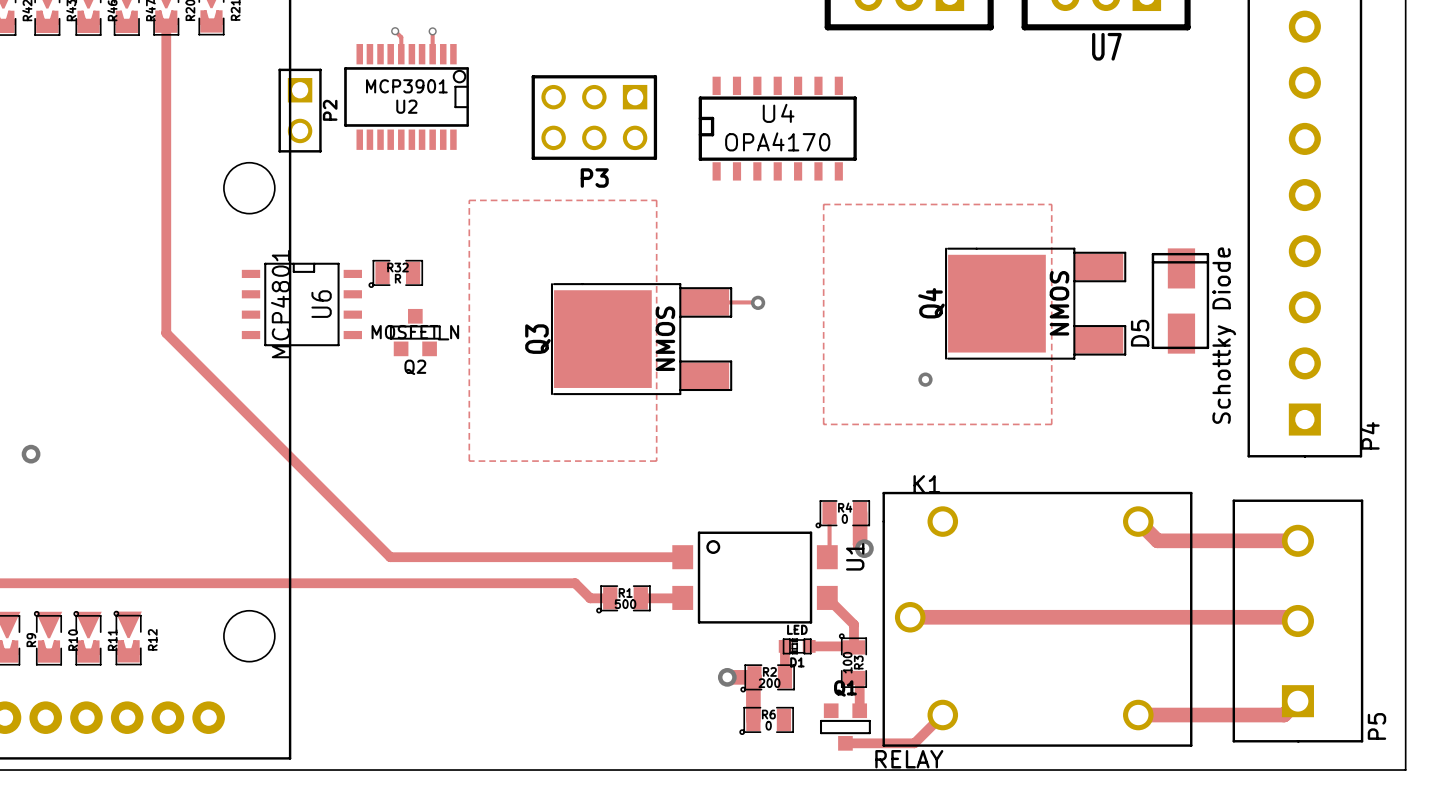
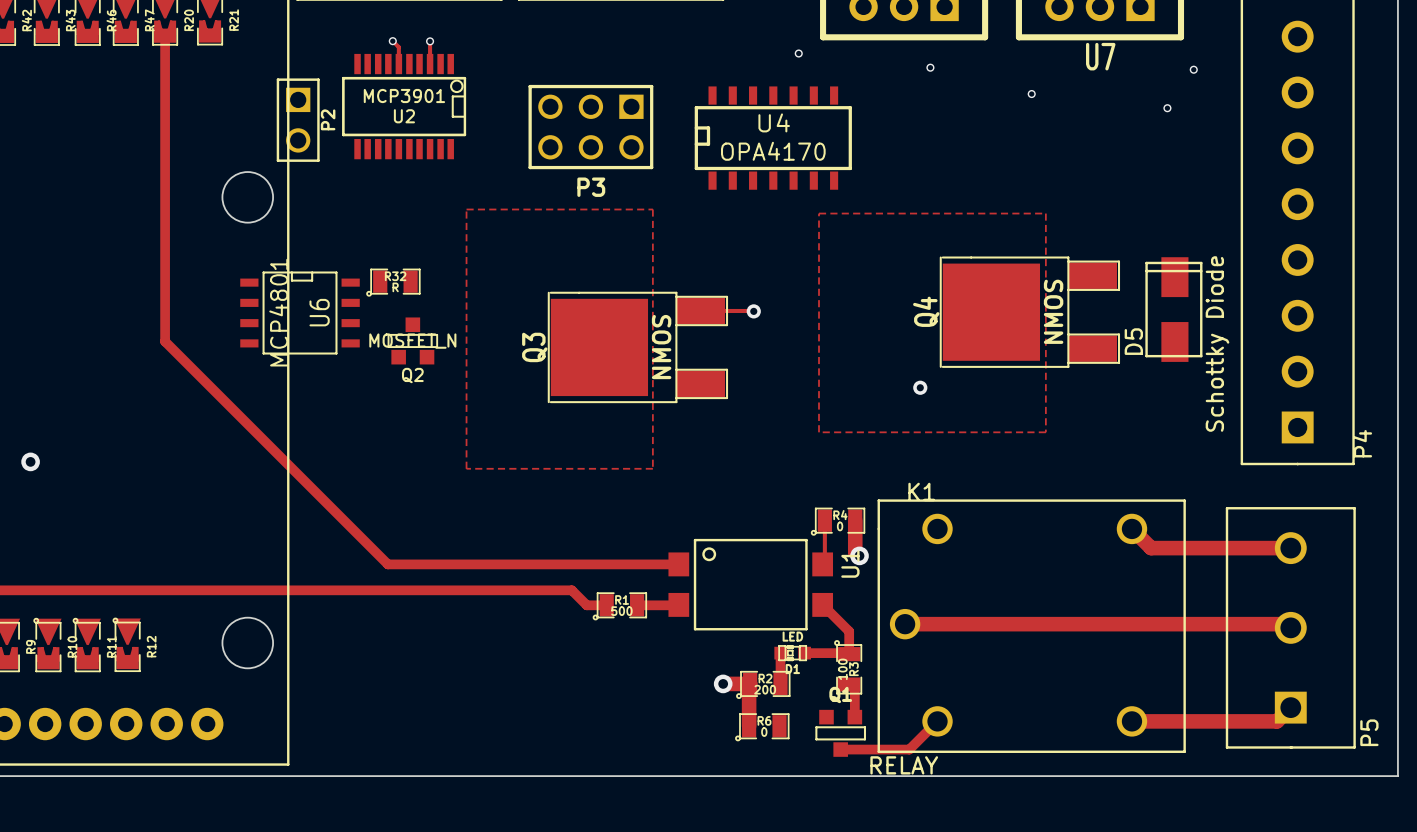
via: none -> (798, 53)
via: none -> (930, 67)
via: none -> (1193, 69)
via: none -> (1031, 94)
via: none -> (1167, 108)

